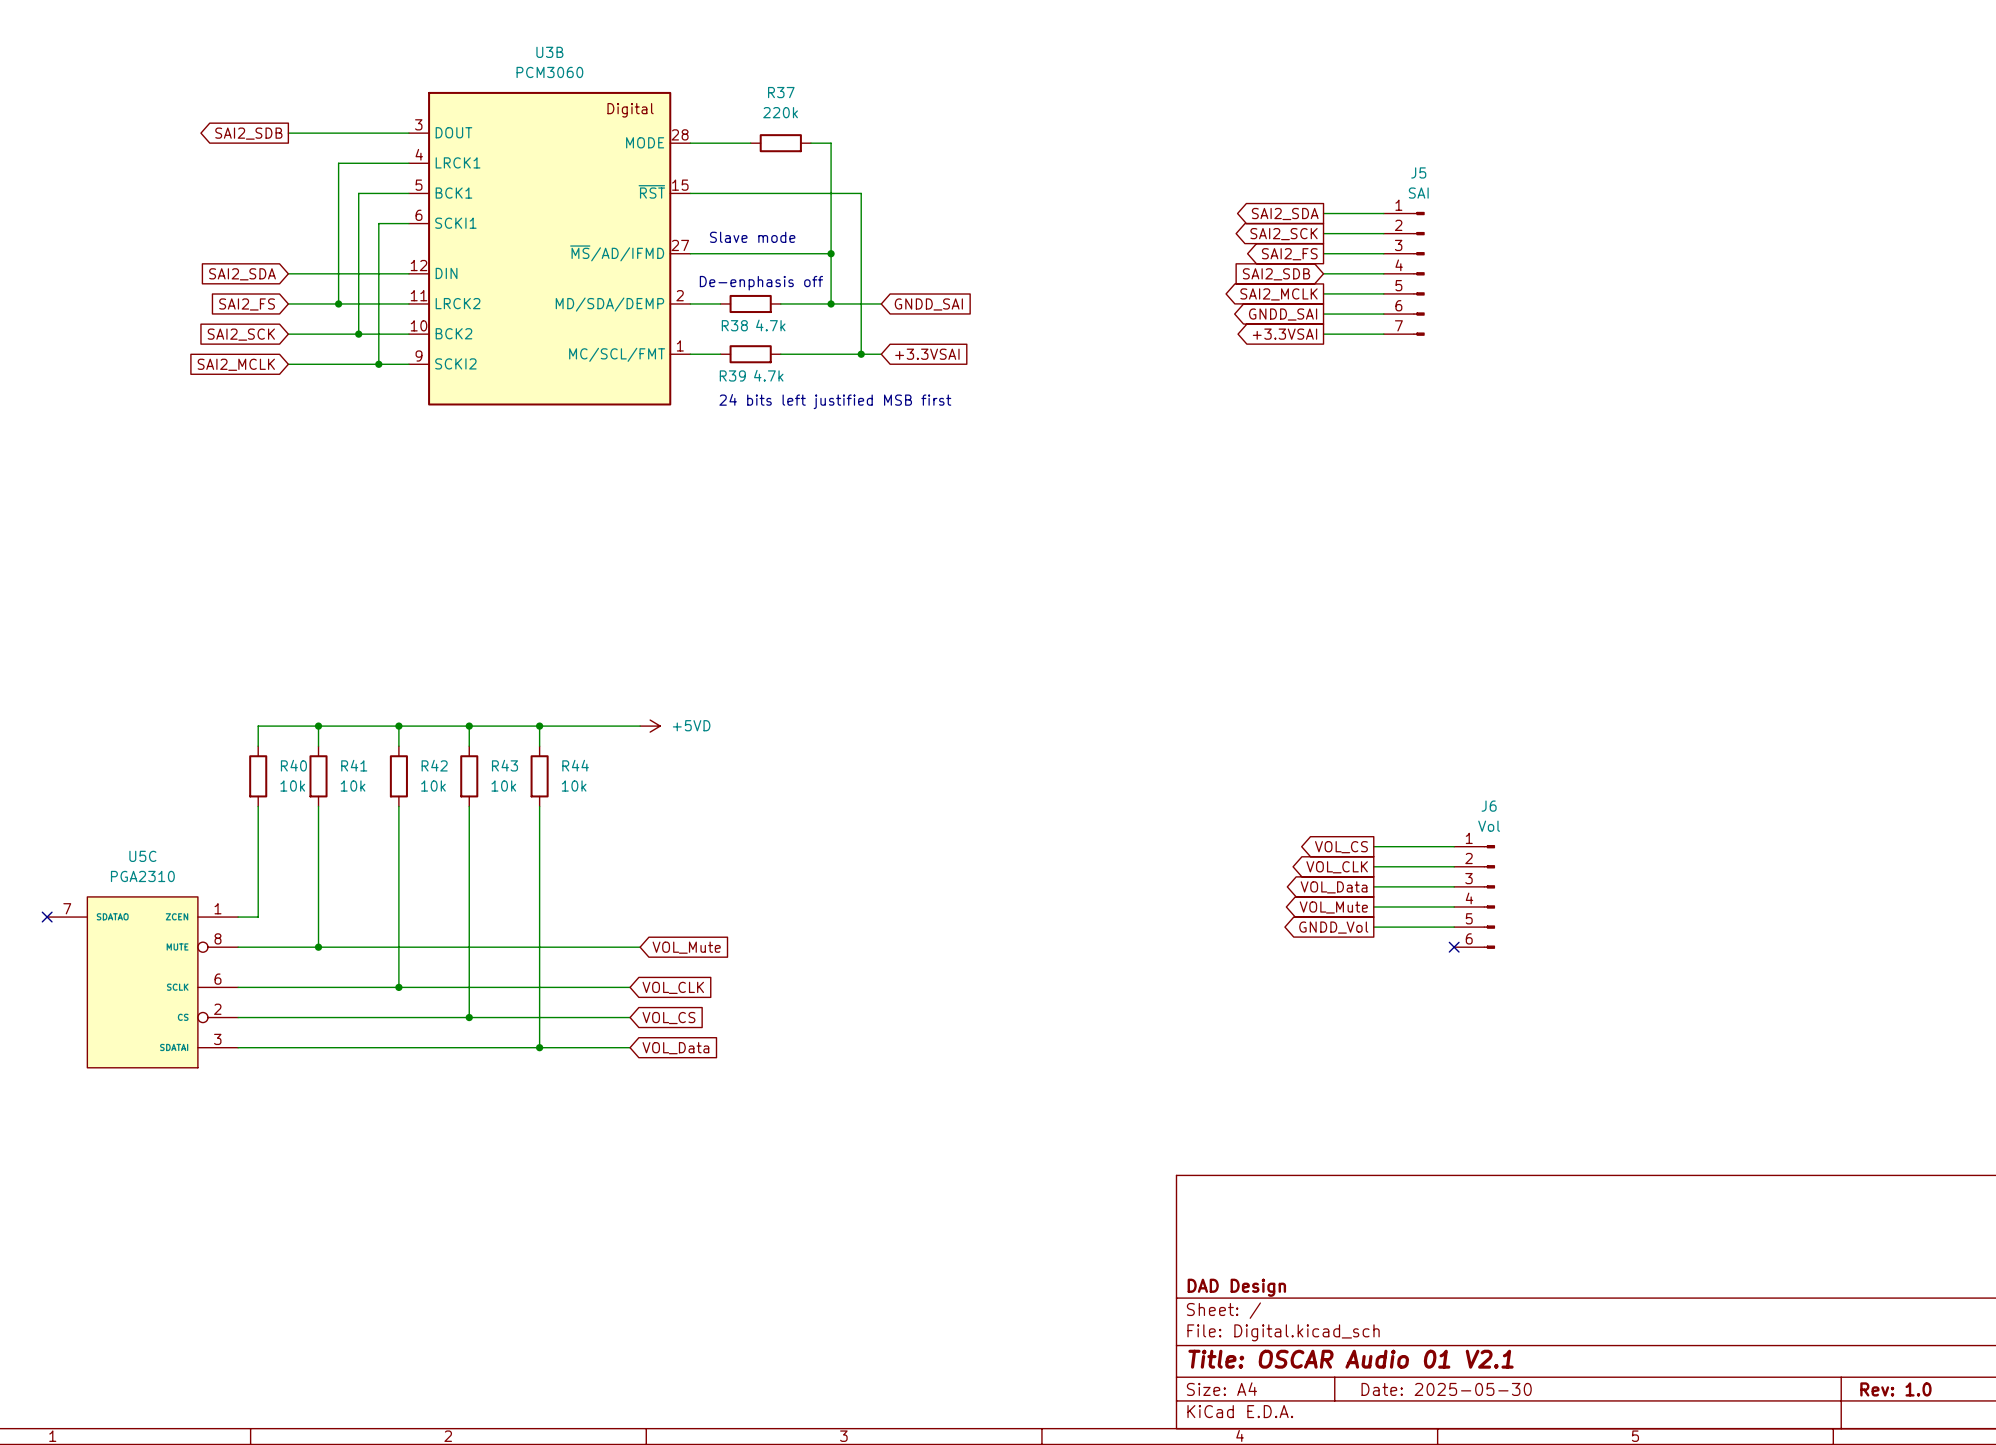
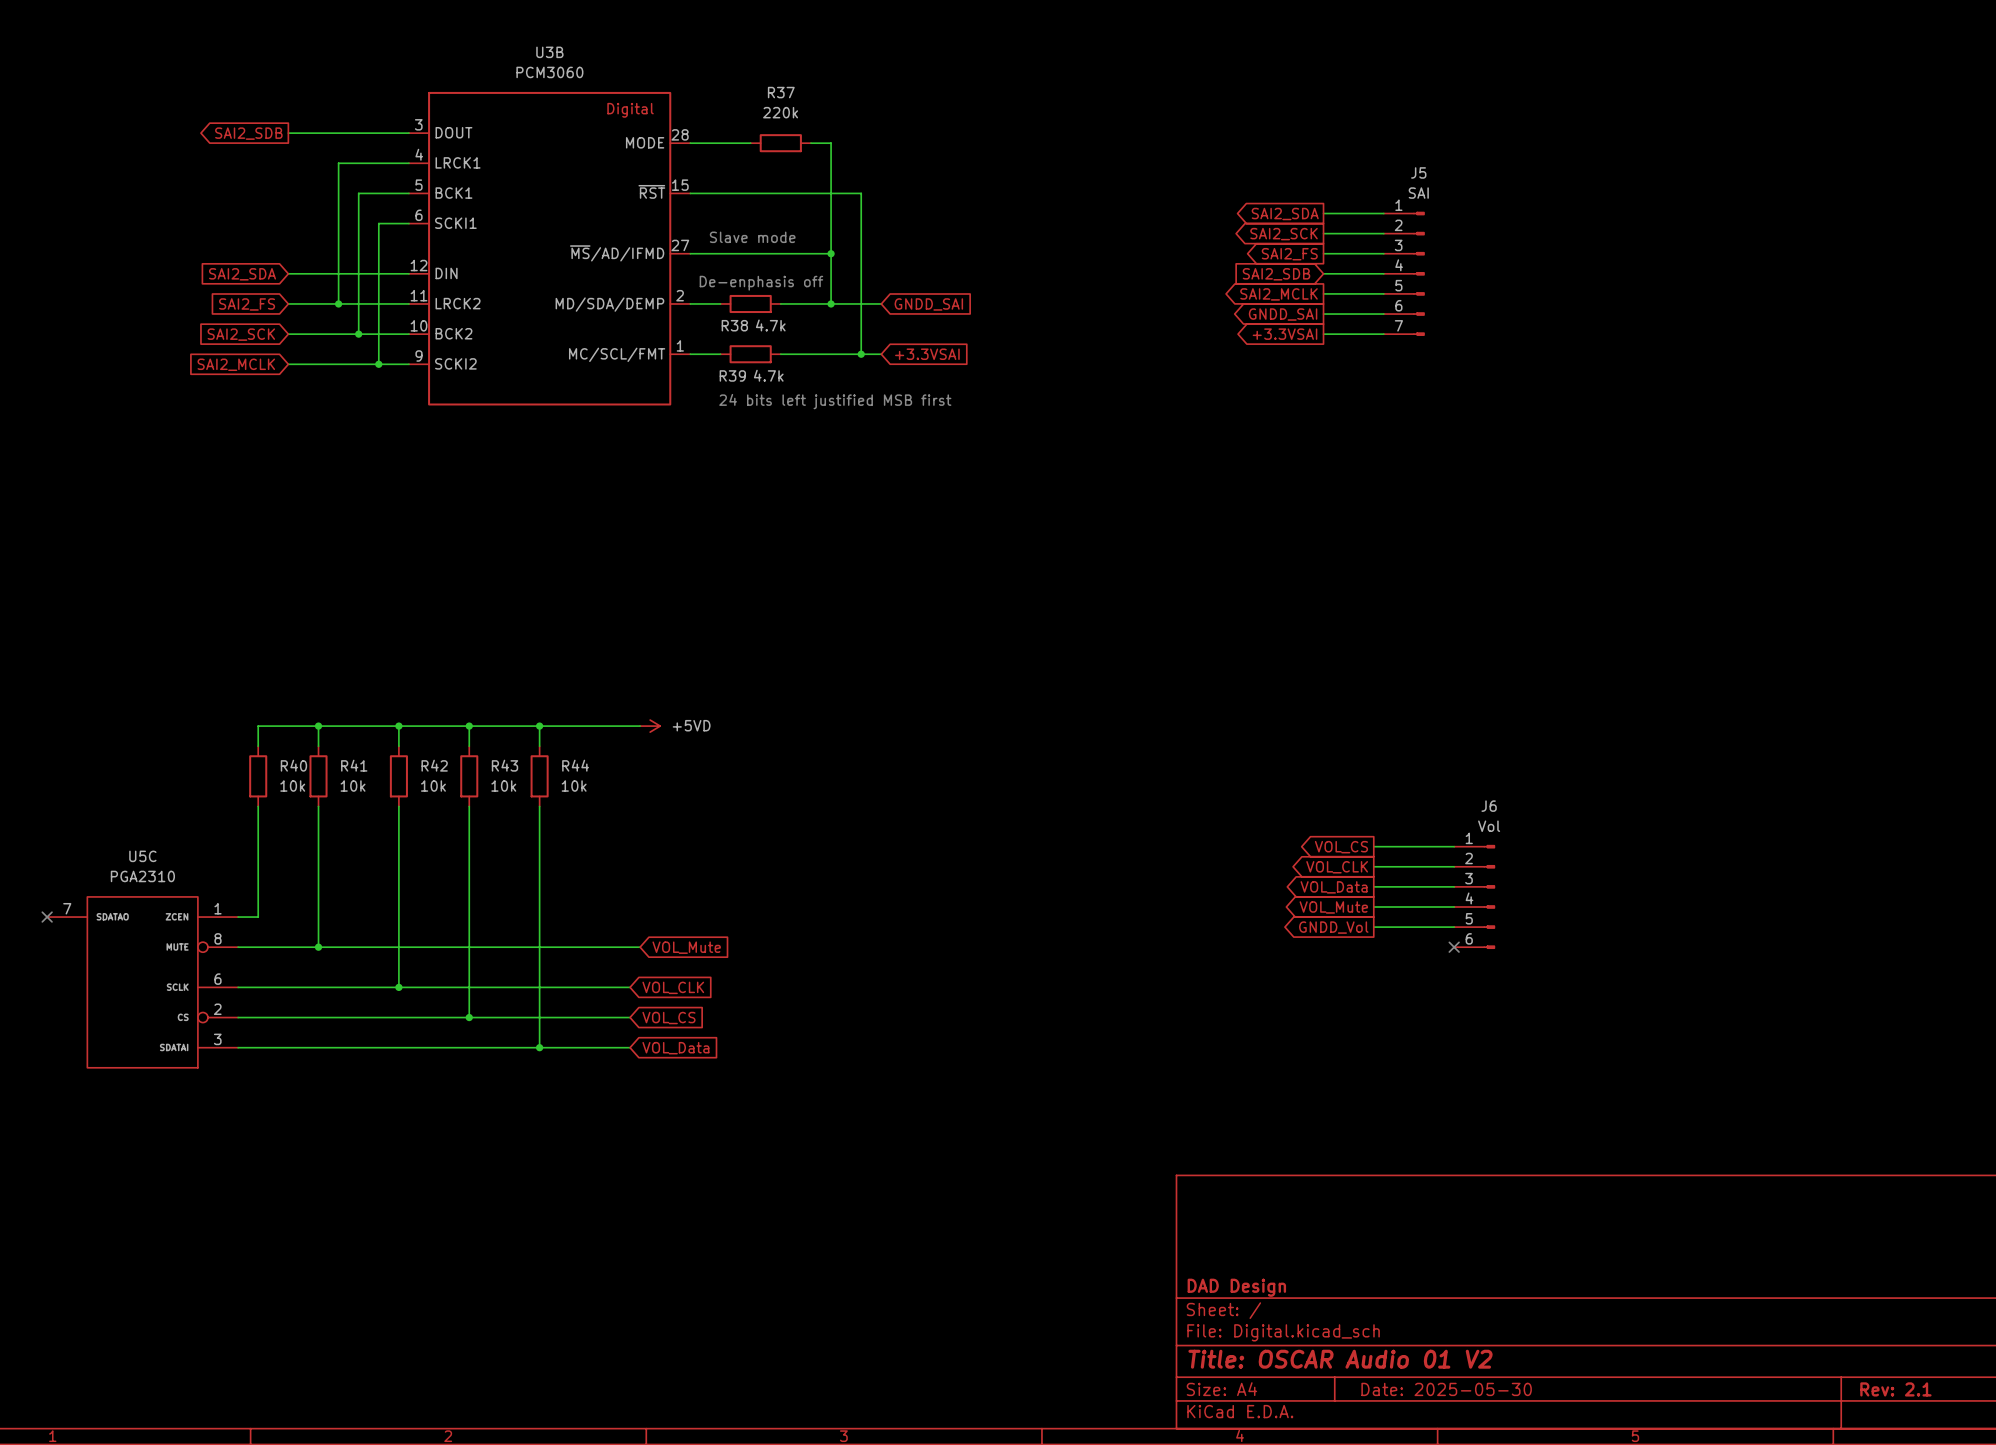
title block: Title: OSCAR Audio 01 V2.1 (1351, 1359) -> Title: OSCAR Audio 01 V2 (1340, 1359)
title block: Rev: 1.0 (1895, 1389) -> Rev: 2.1 (1895, 1389)

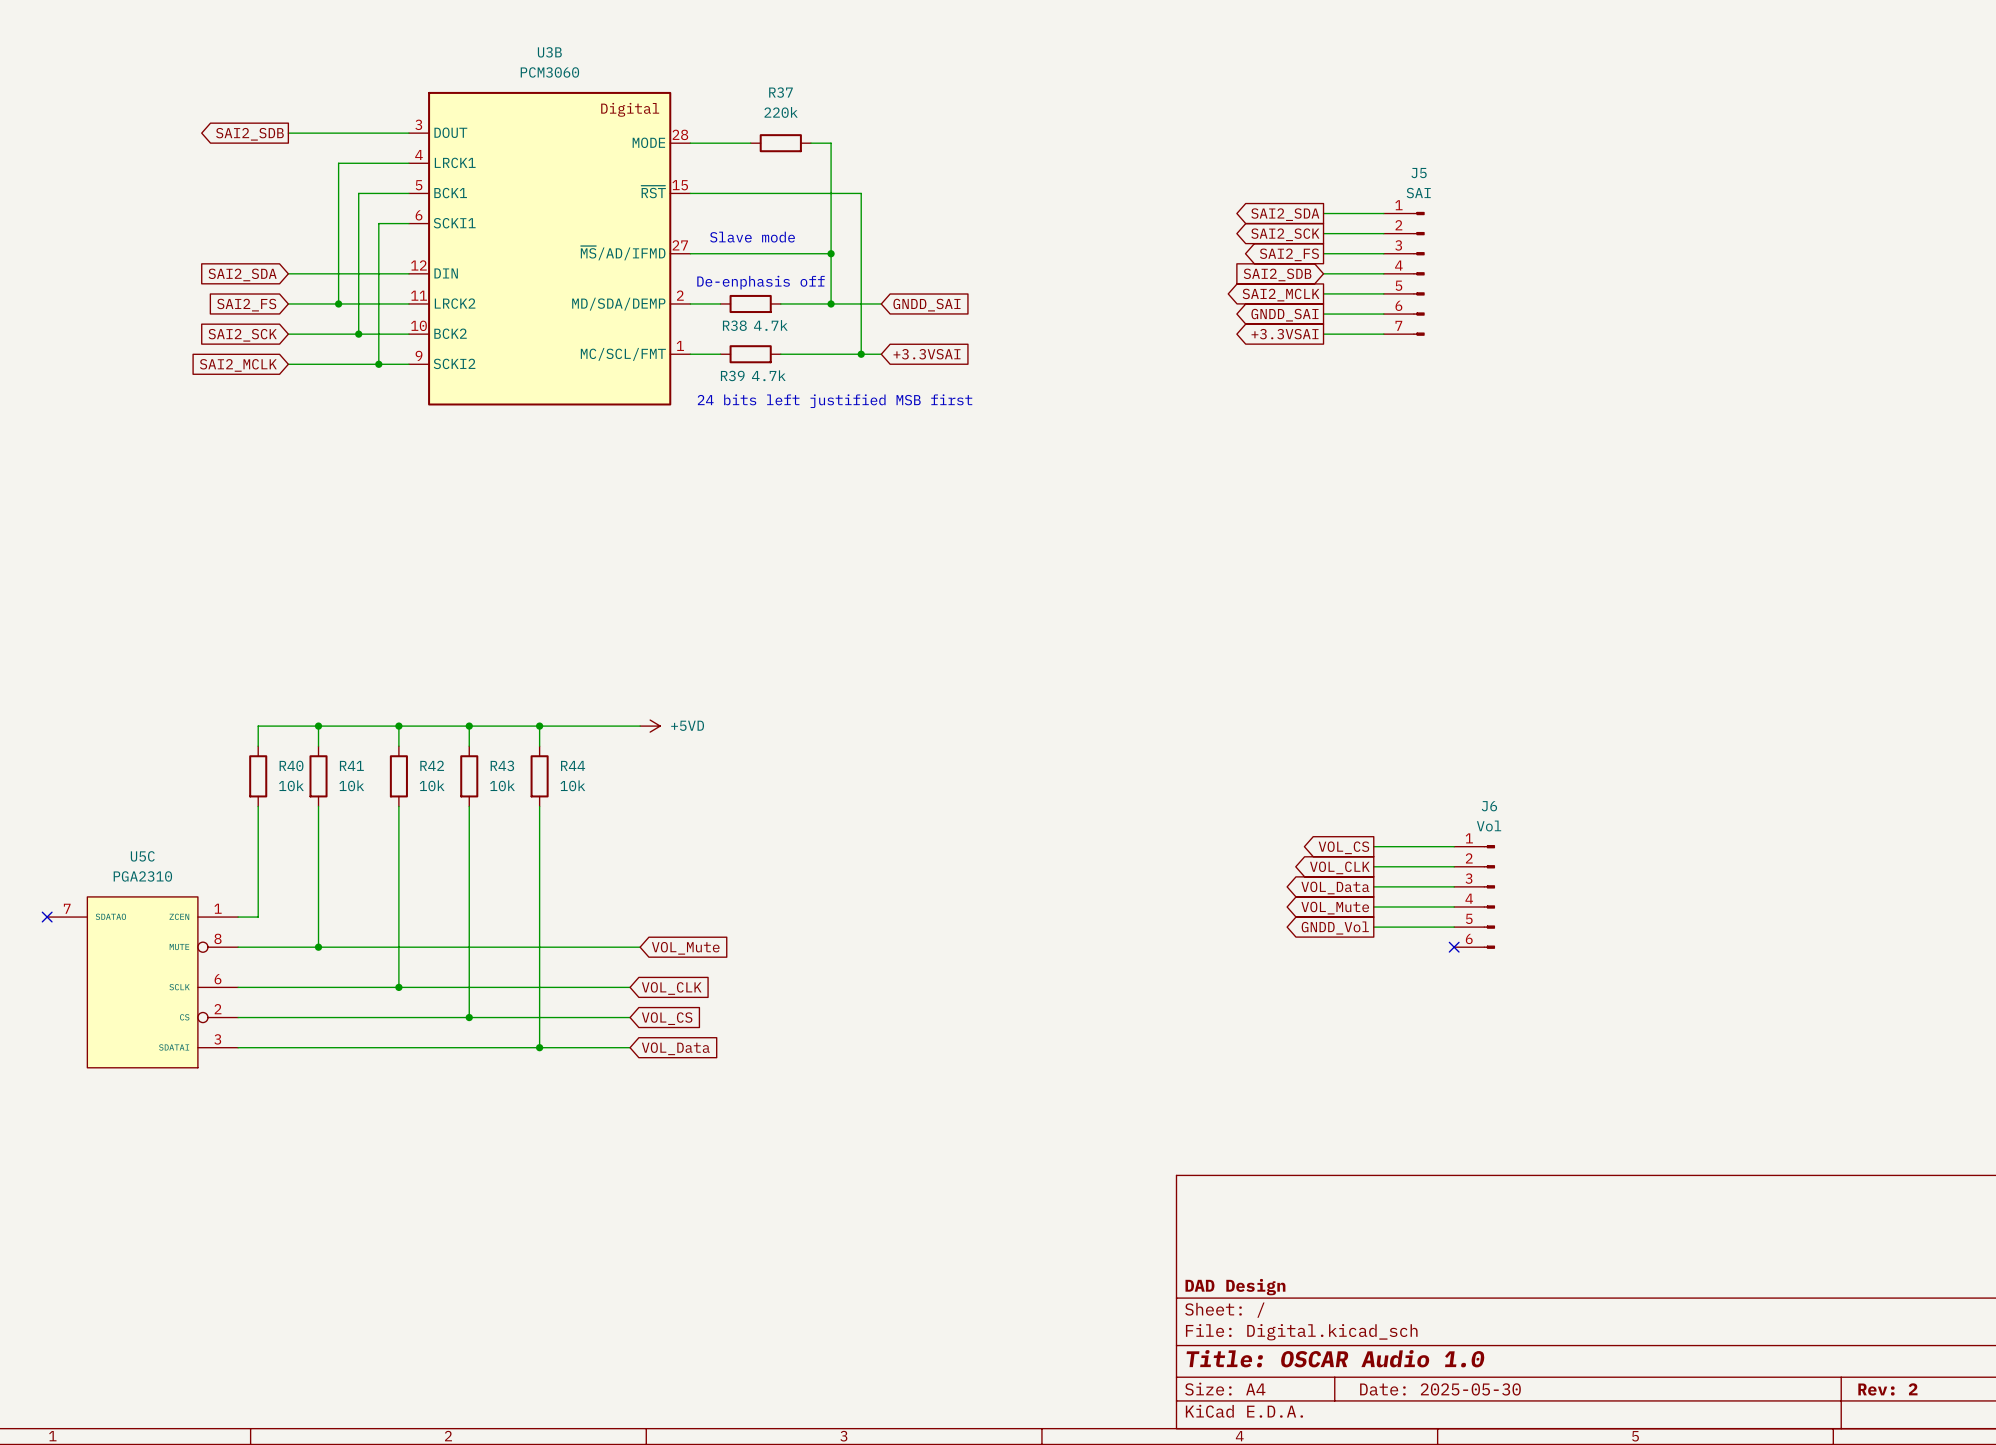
title block: Title: OSCAR Audio 01 V2 (1340, 1359) -> Title: OSCAR Audio 1.0 (1335, 1358)
title block: Rev: 2.1 (1895, 1389) -> Rev: 2 (1887, 1389)

